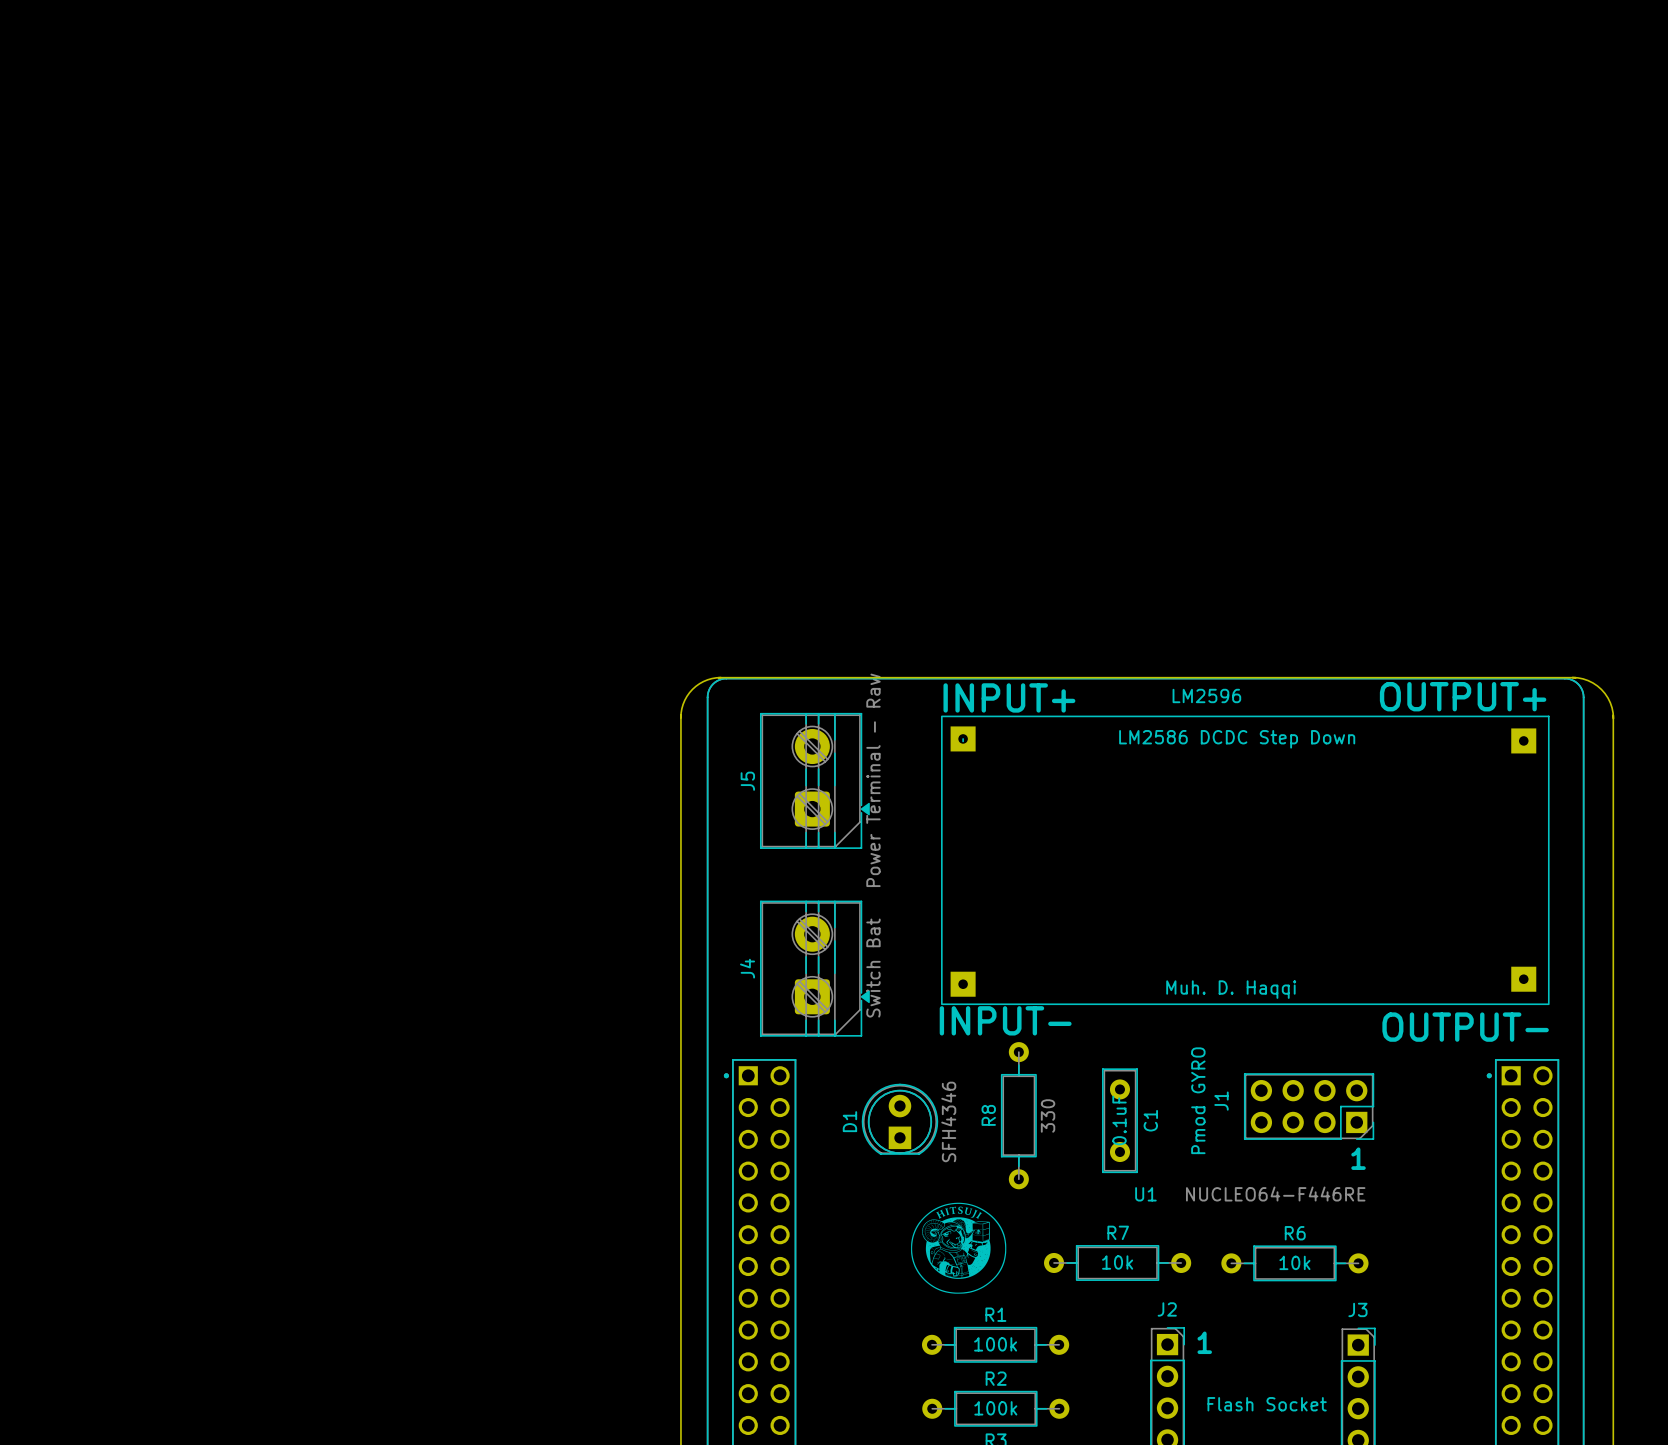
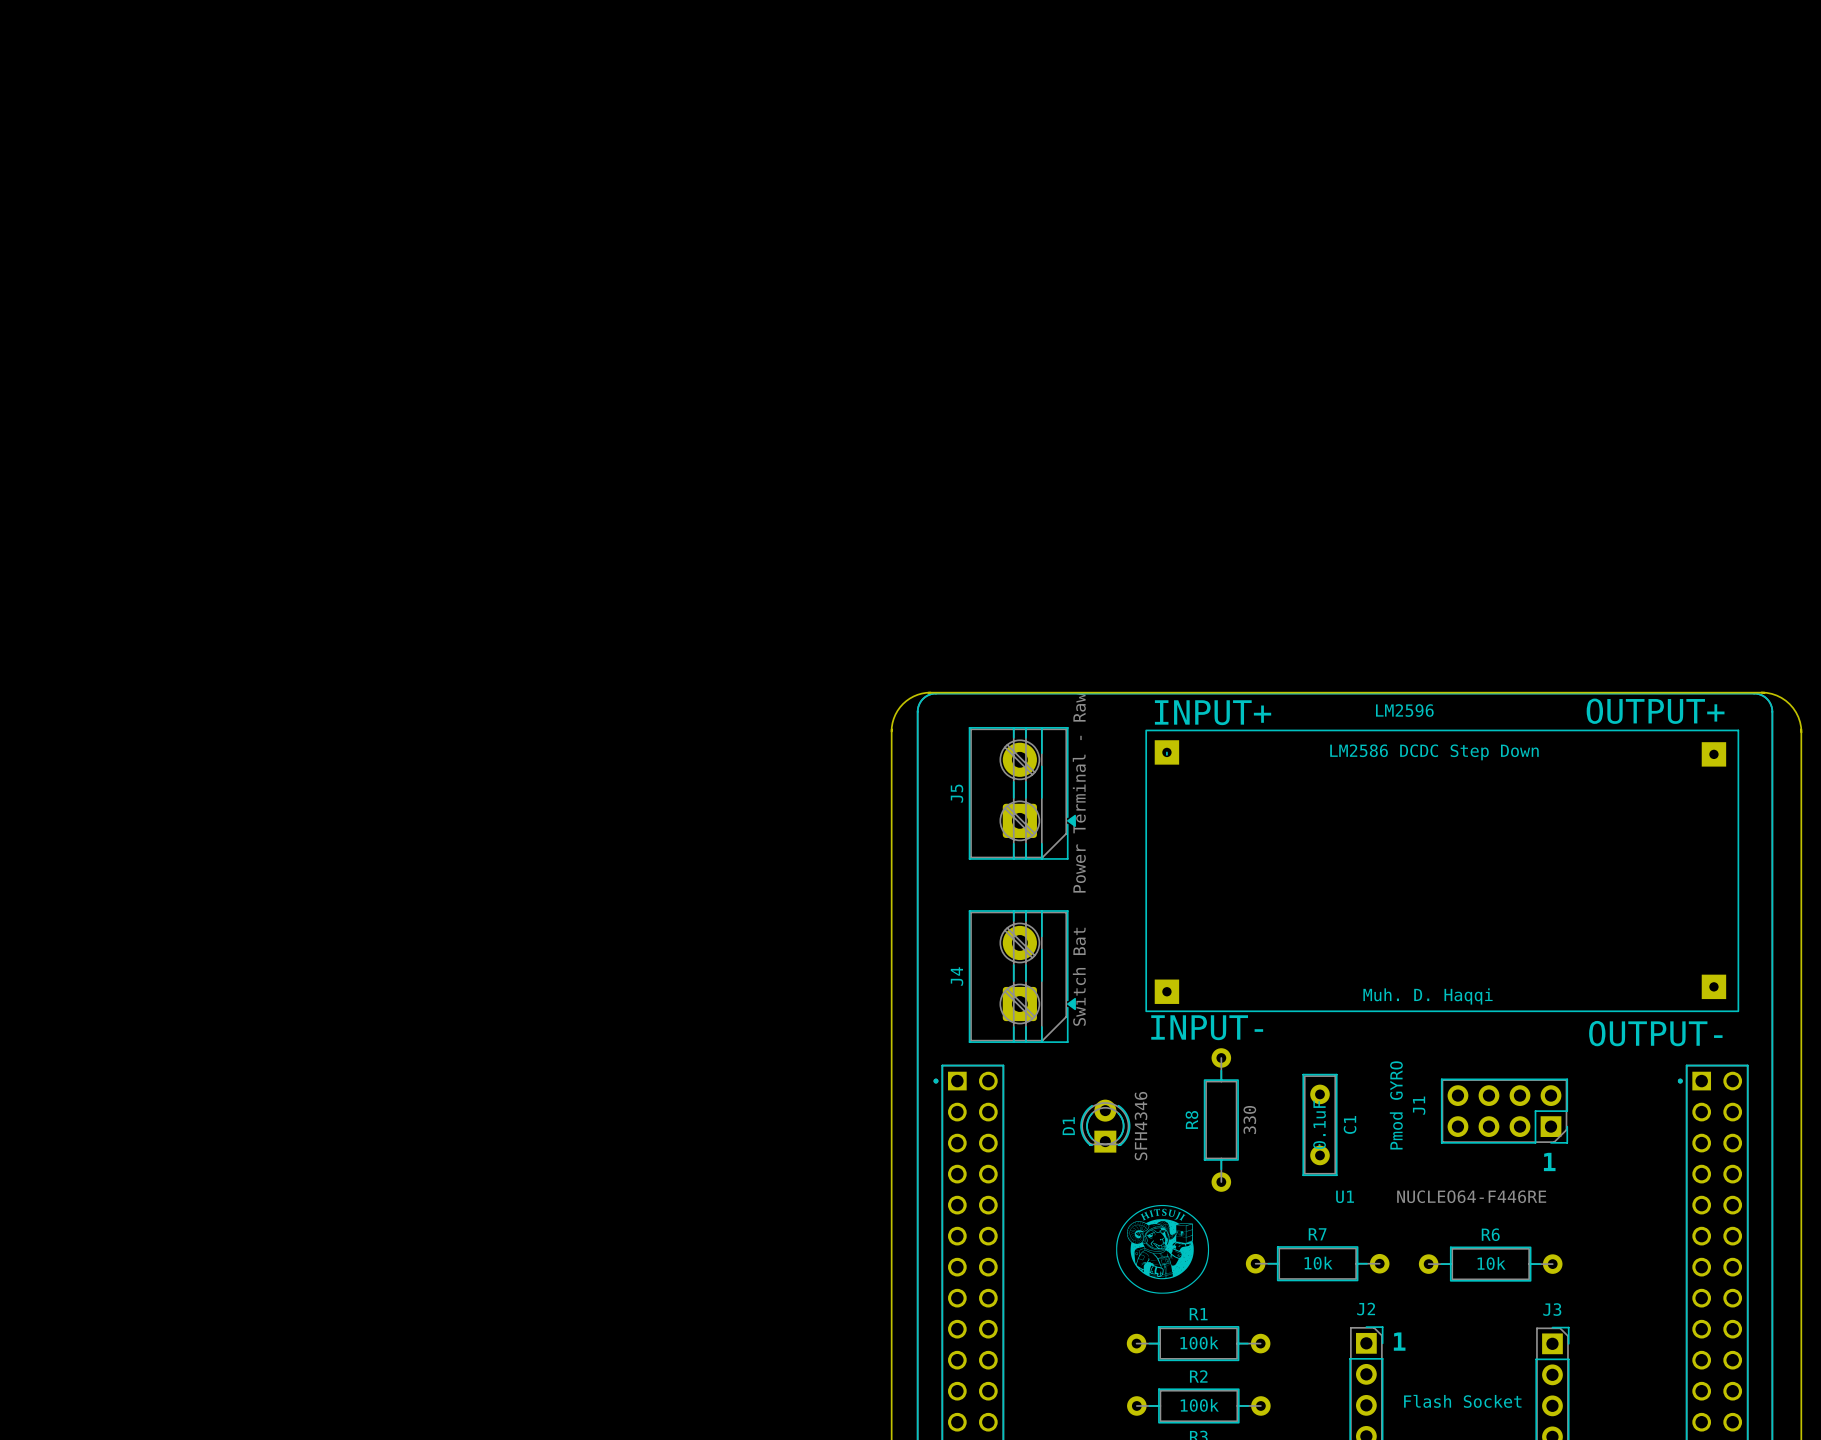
D1 footprint: [861, 1083, 939, 1155] -> [1080, 1099, 1131, 1153]

